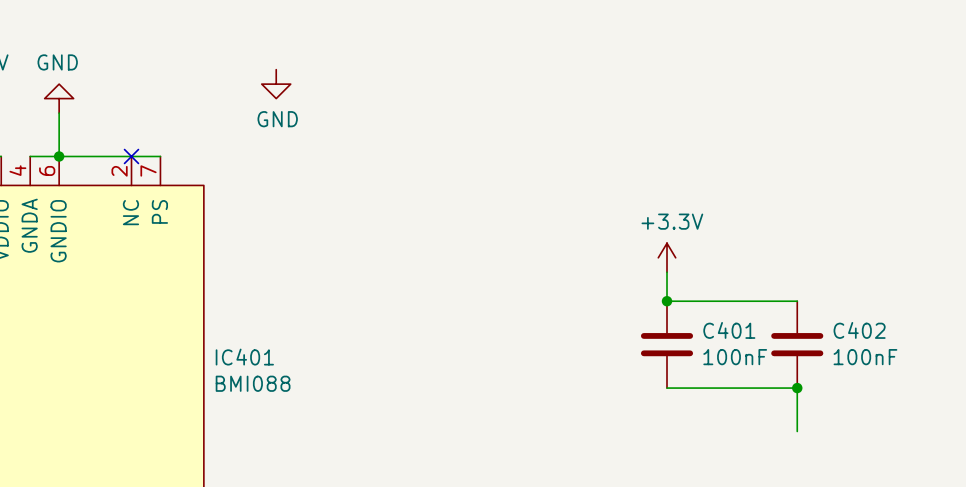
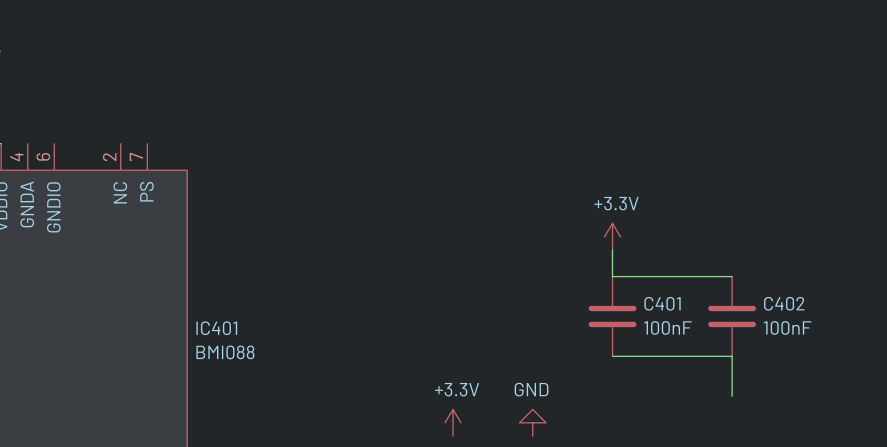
power symbol: GND (276, 84) -> none
power symbol: GND (59, 98) -> none
wire: (59, 113) (59, 156) -> none
wire: (30, 156) (160, 156) -> none
junction: (59, 156) -> none
no-connect mark: (131, 156) -> none
junction: (667, 301) -> none
junction: (797, 388) -> none
power symbol: none -> +3.3V (453, 422)
power symbol: none -> GND (532, 422)

